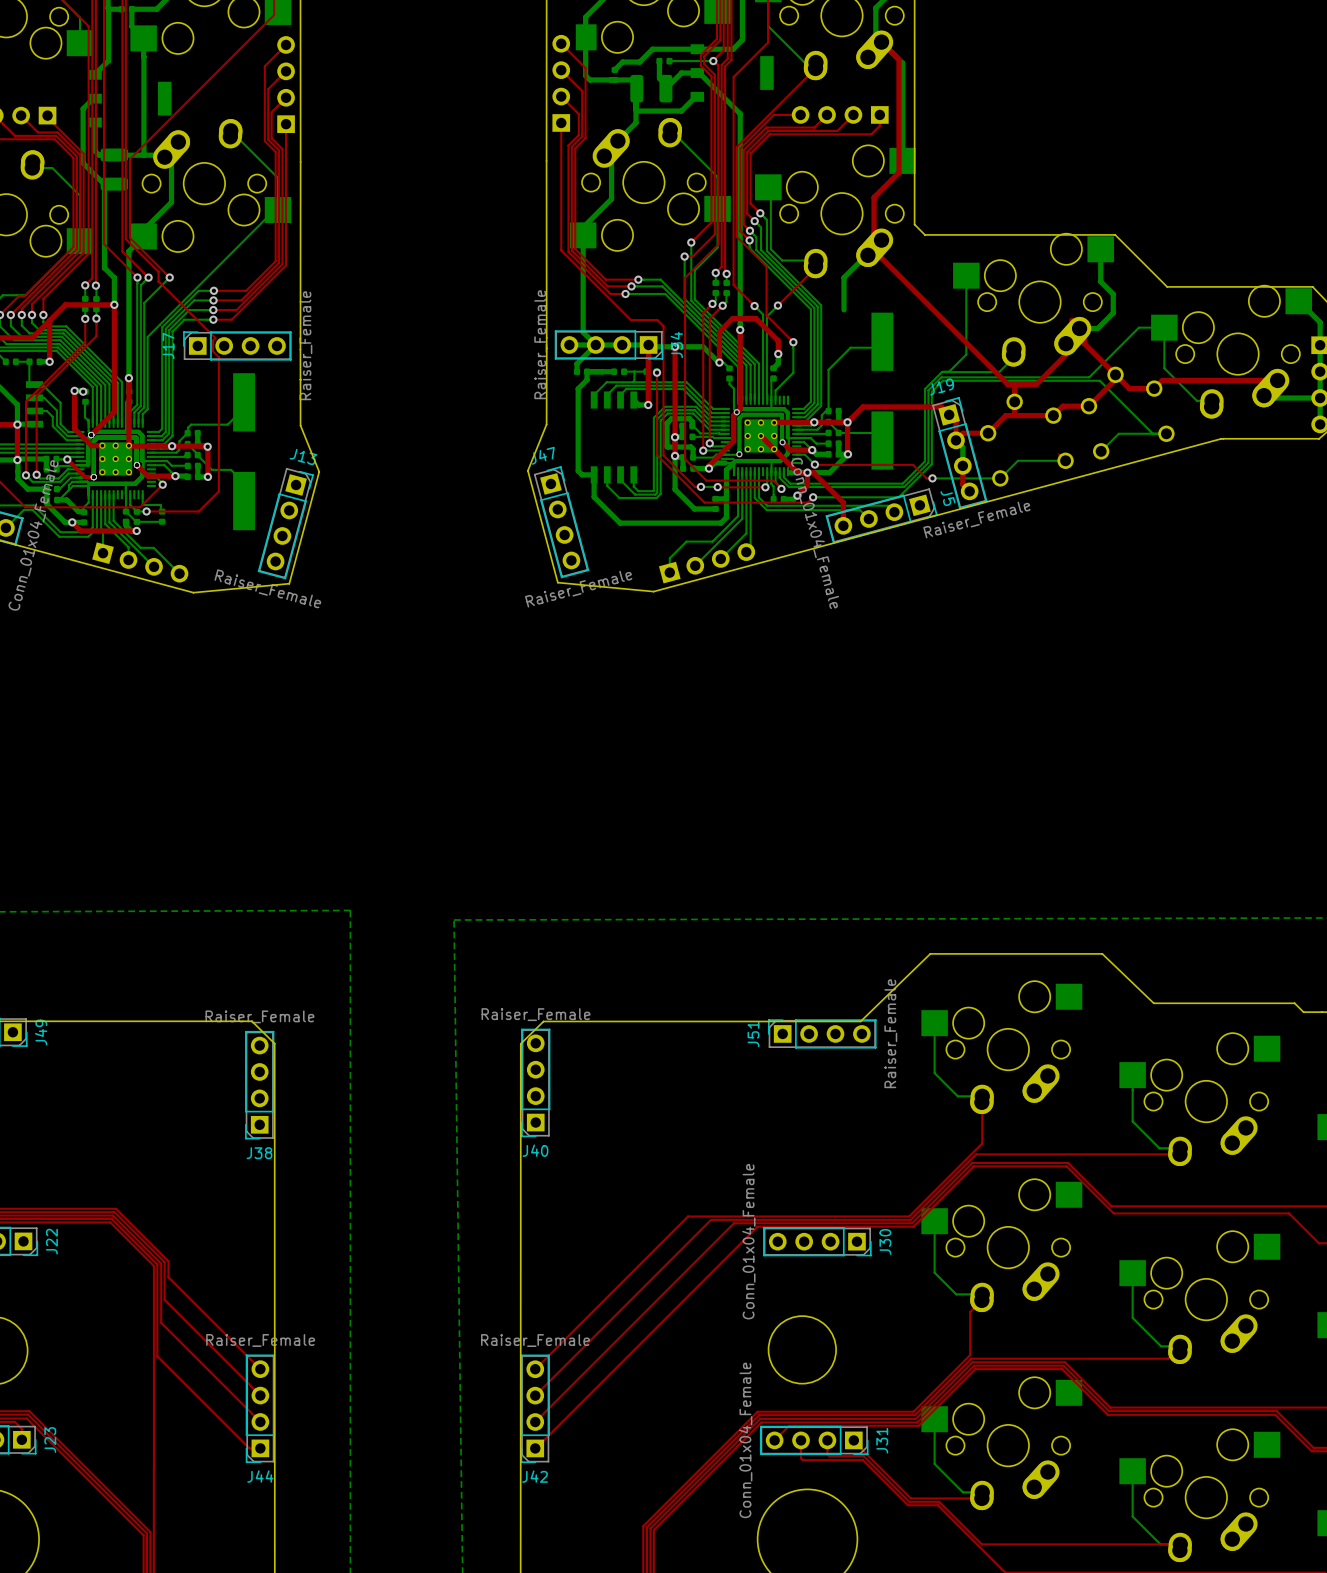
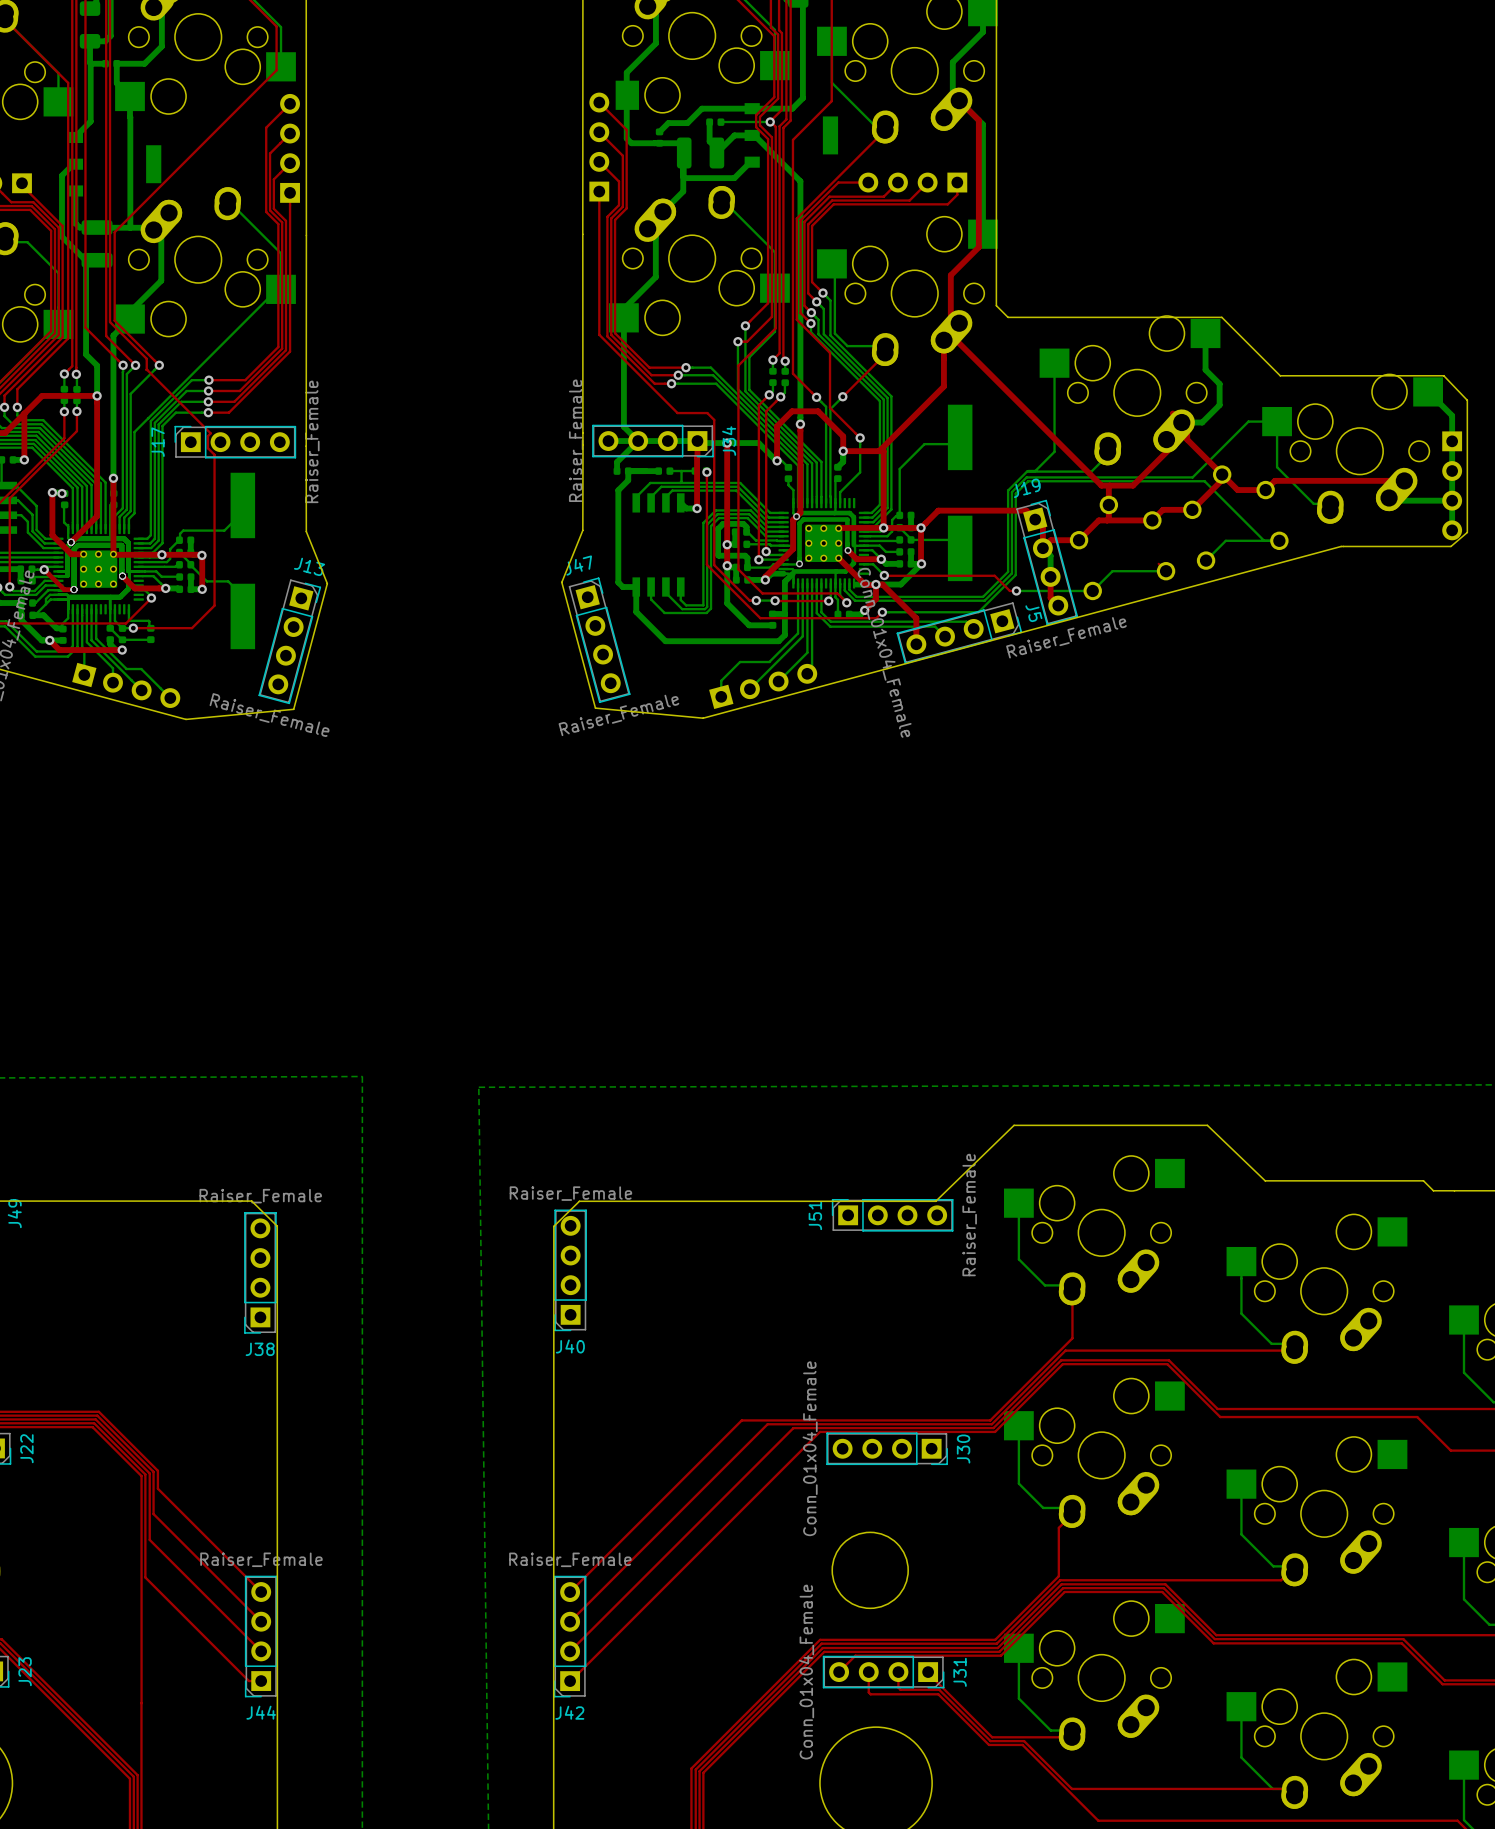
bottom track: (881, 240) (844, 277) (844, 309) -> none
top track: none -> (943, 340) (943, 386) (879, 451) (843, 451)
top track: none -> (881, 449) (883, 451) (883, 527)
top track: (760, 435) (774, 449) -> none

